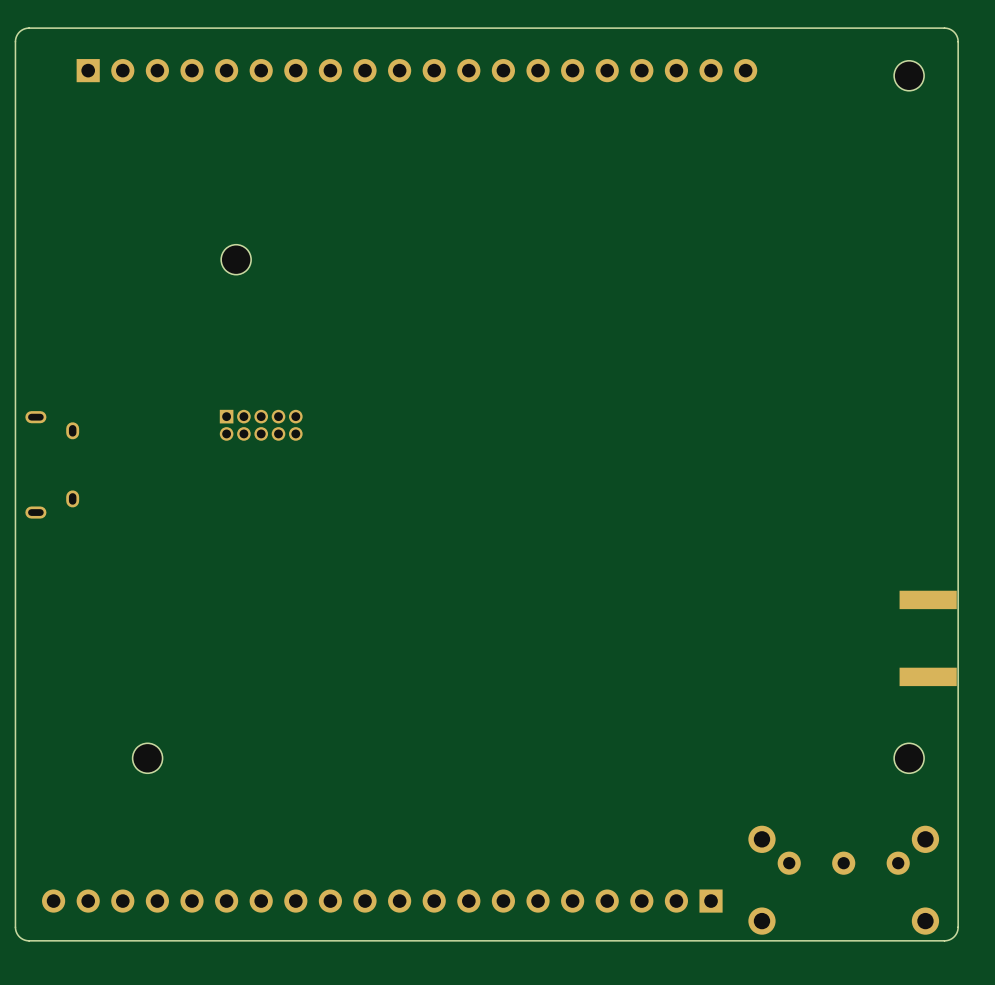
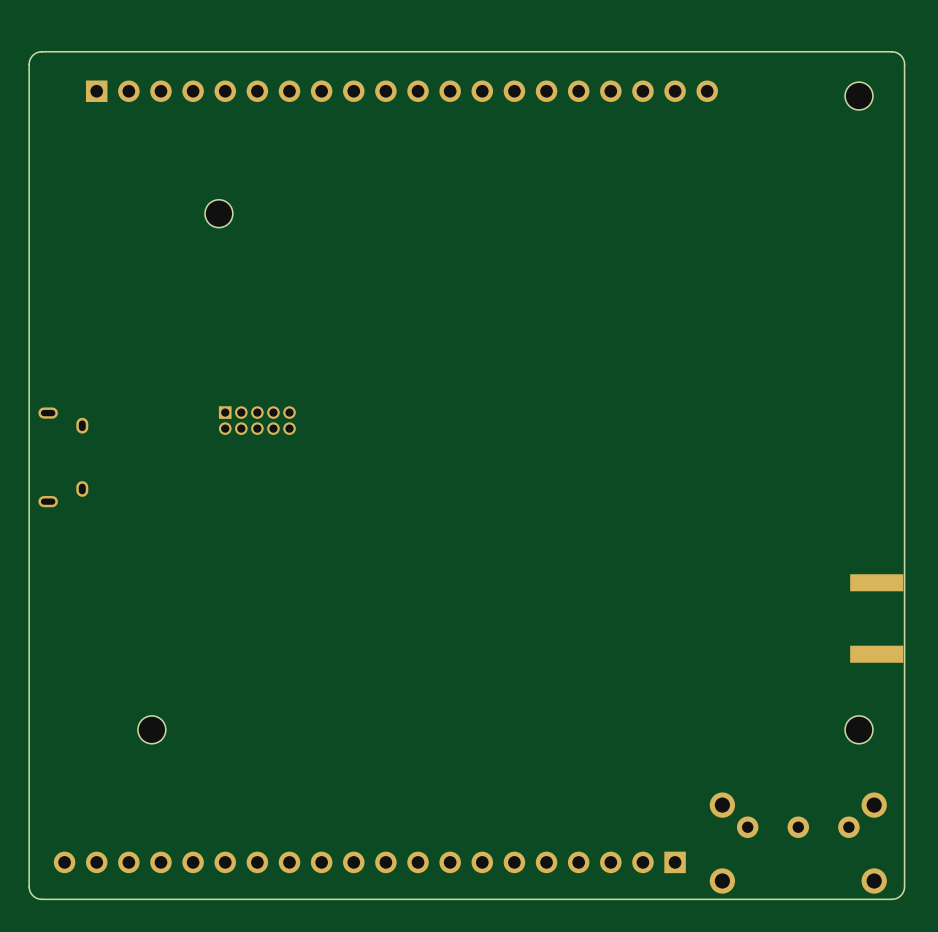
part position: (236, 259) -> (218, 213)

